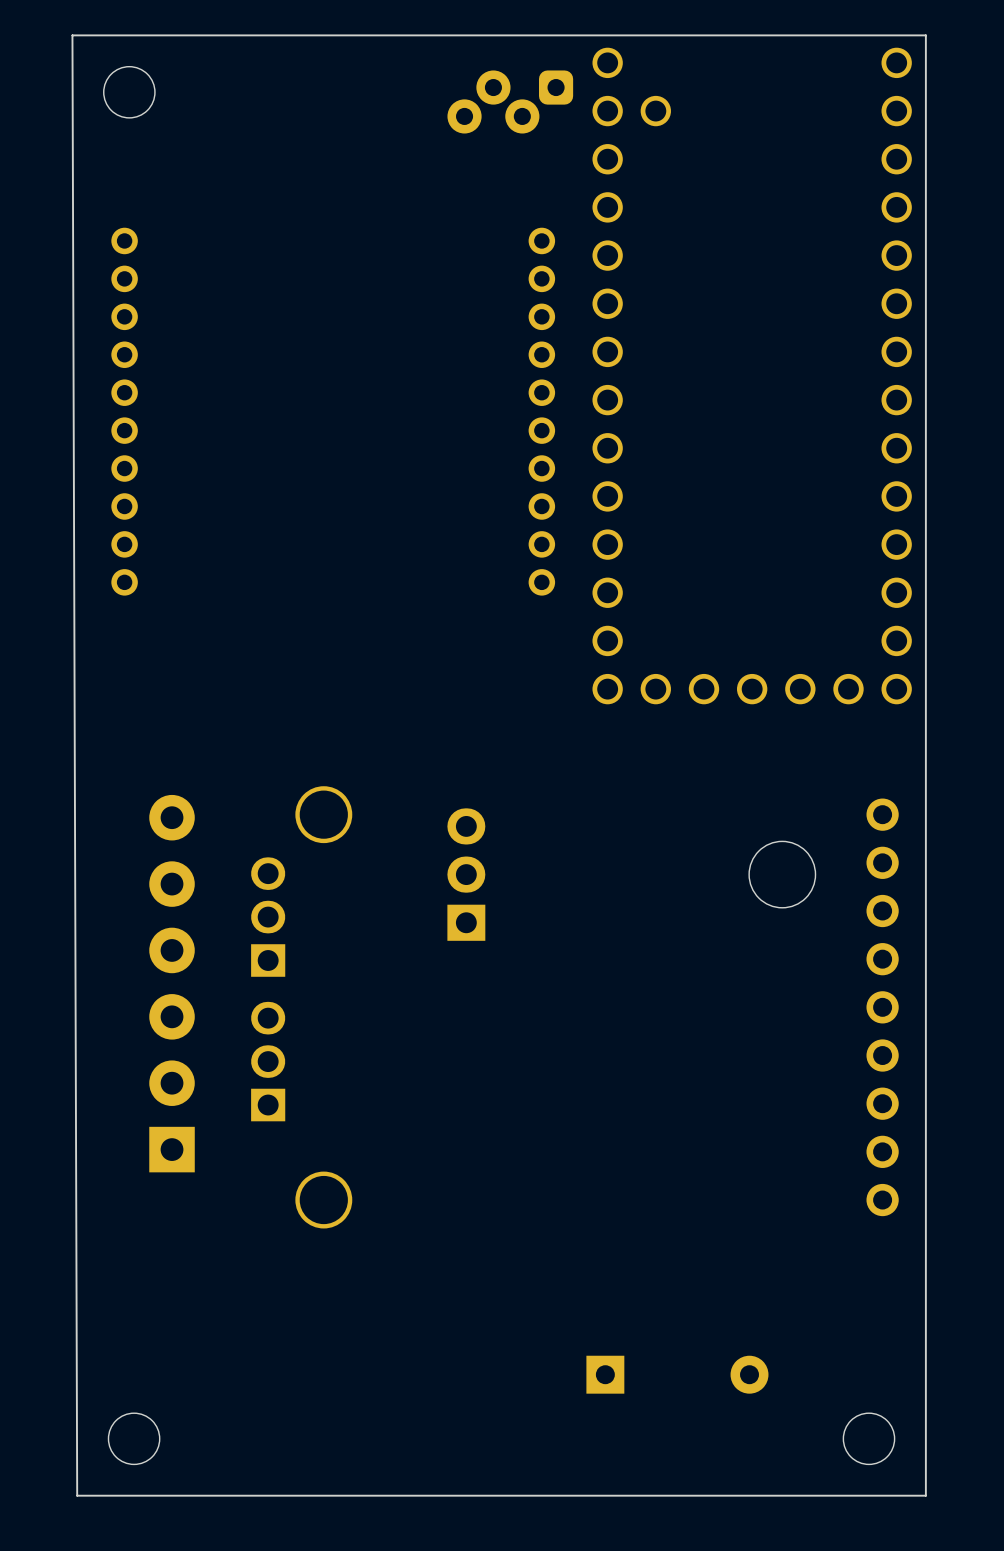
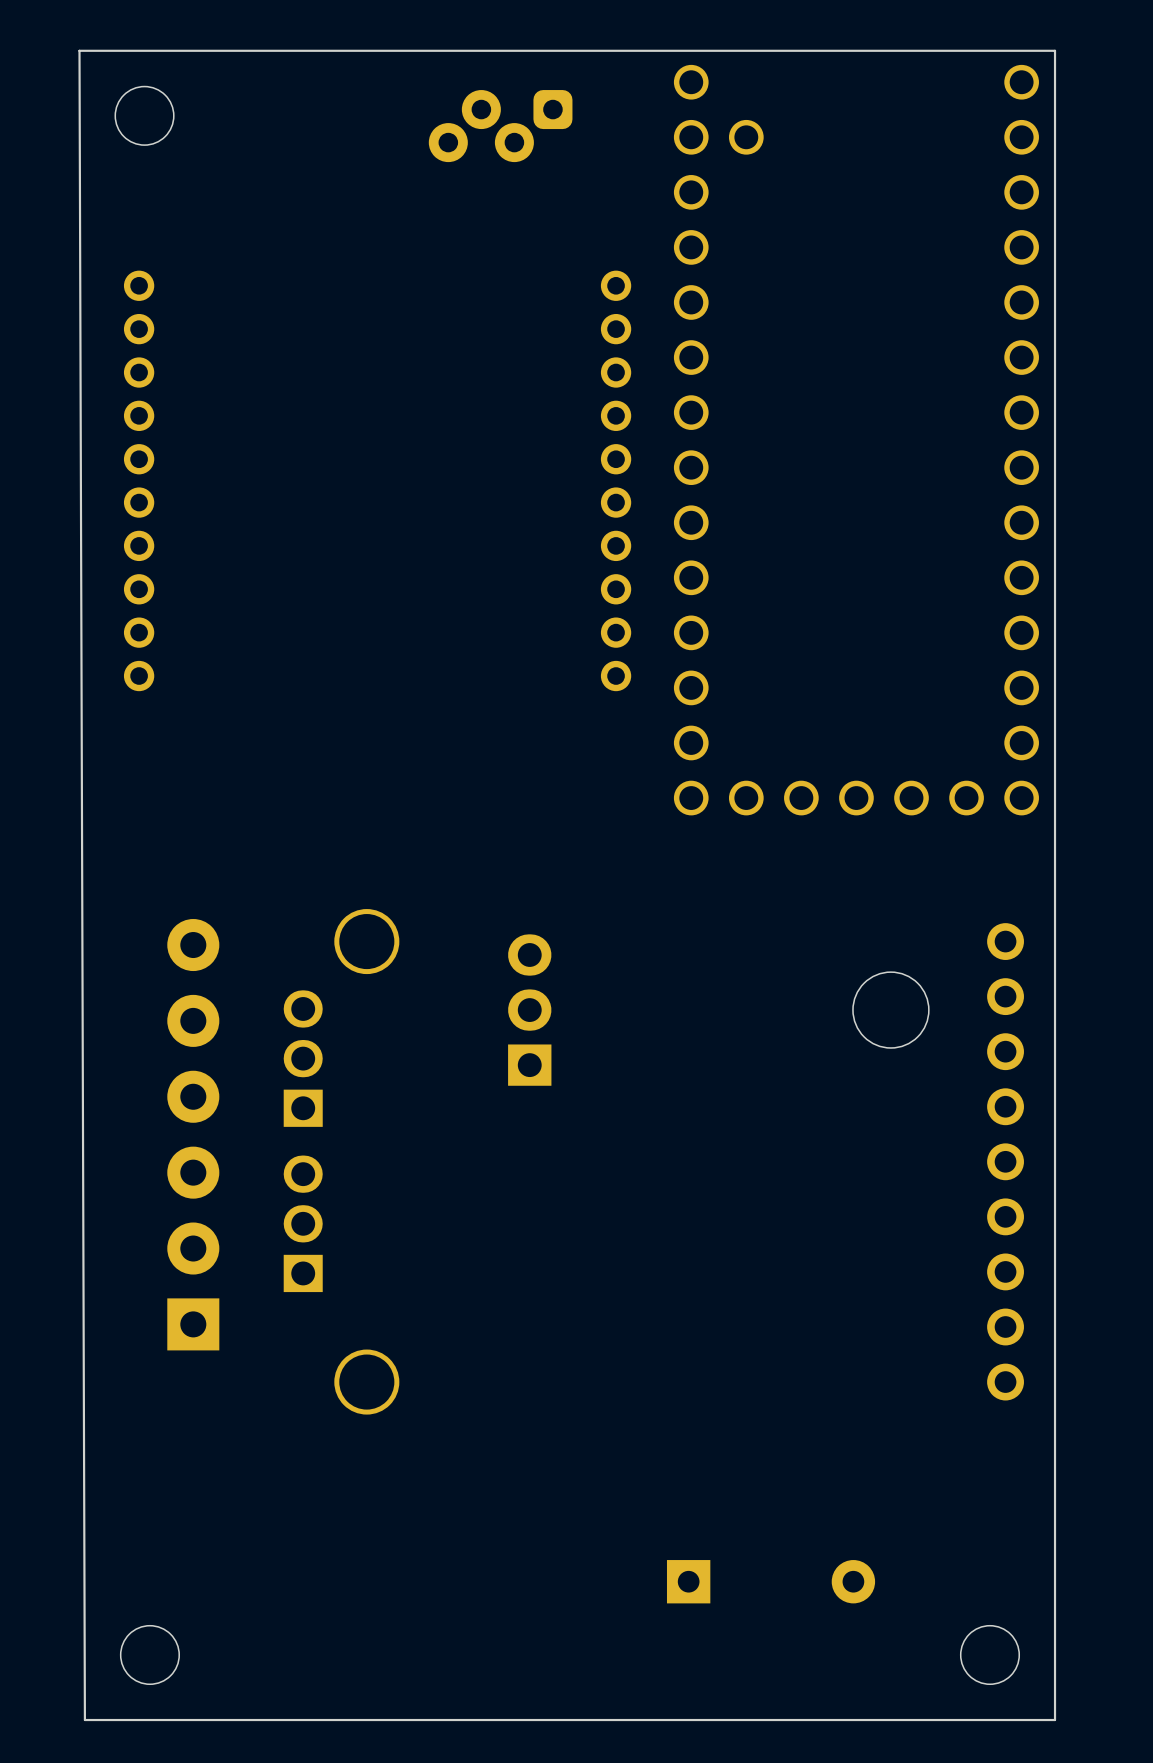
part position: (510, 101) -> (500, 126)

